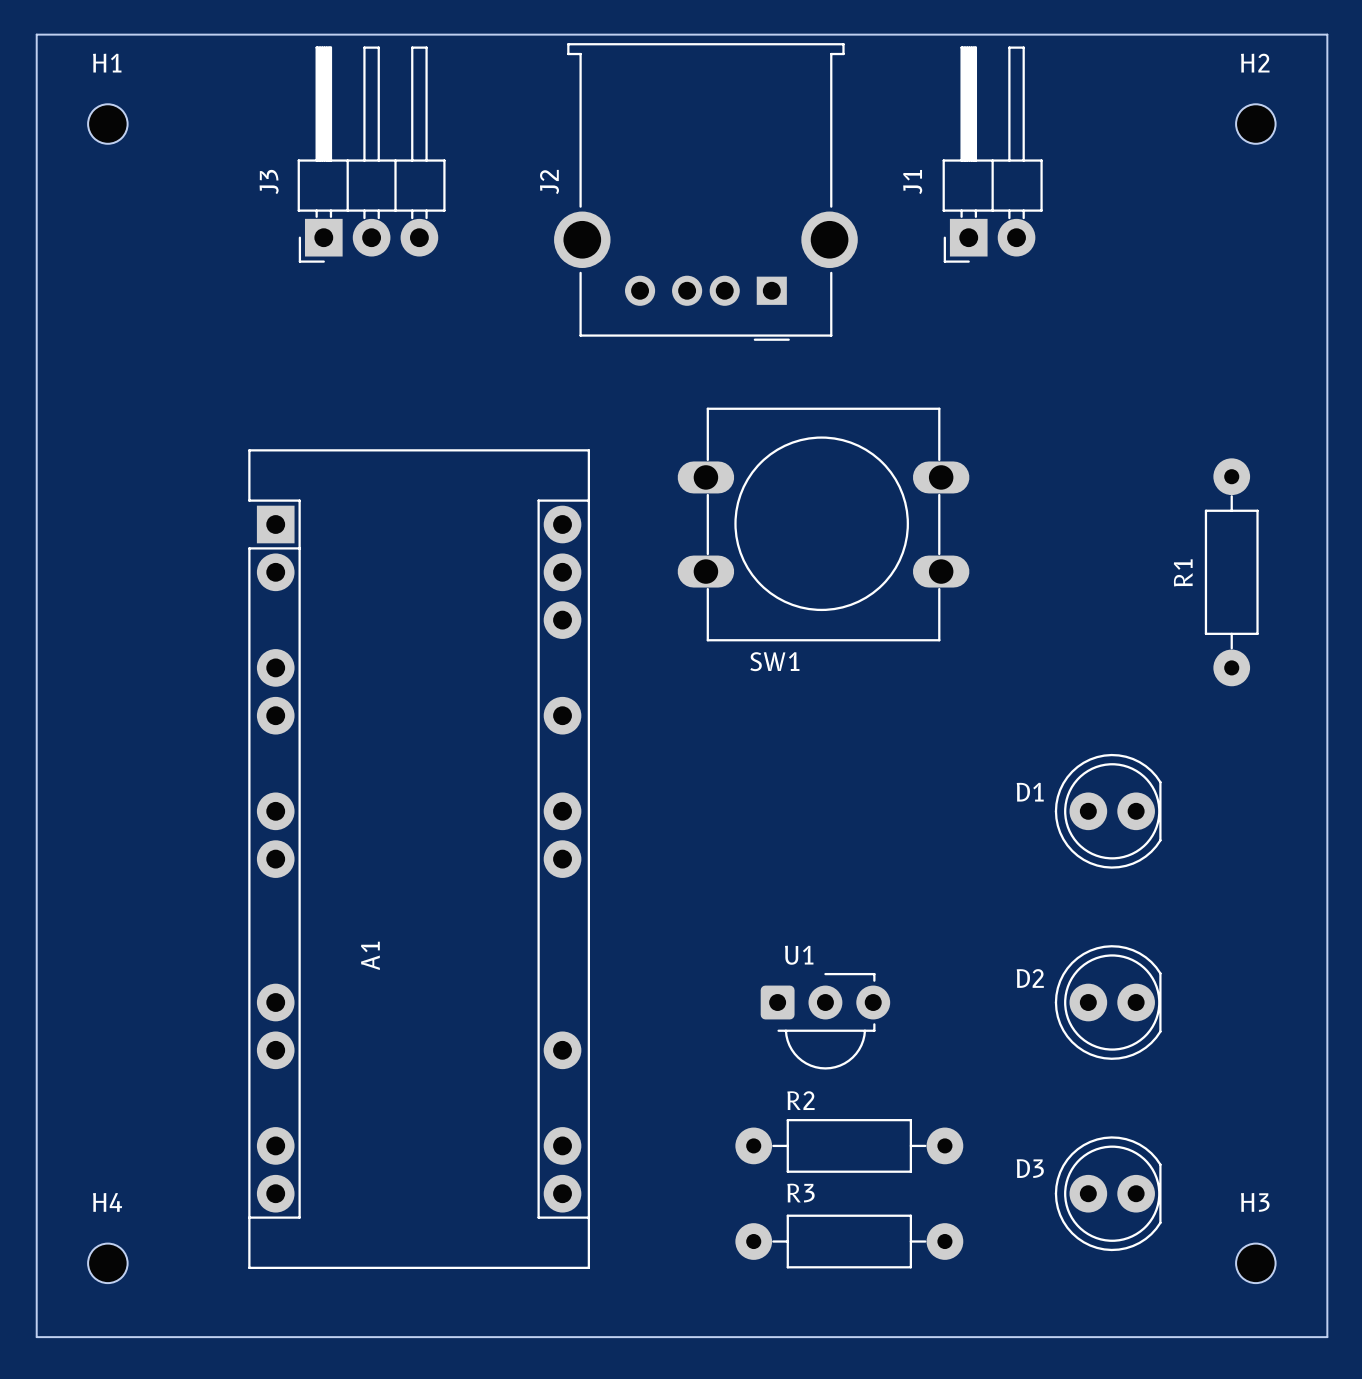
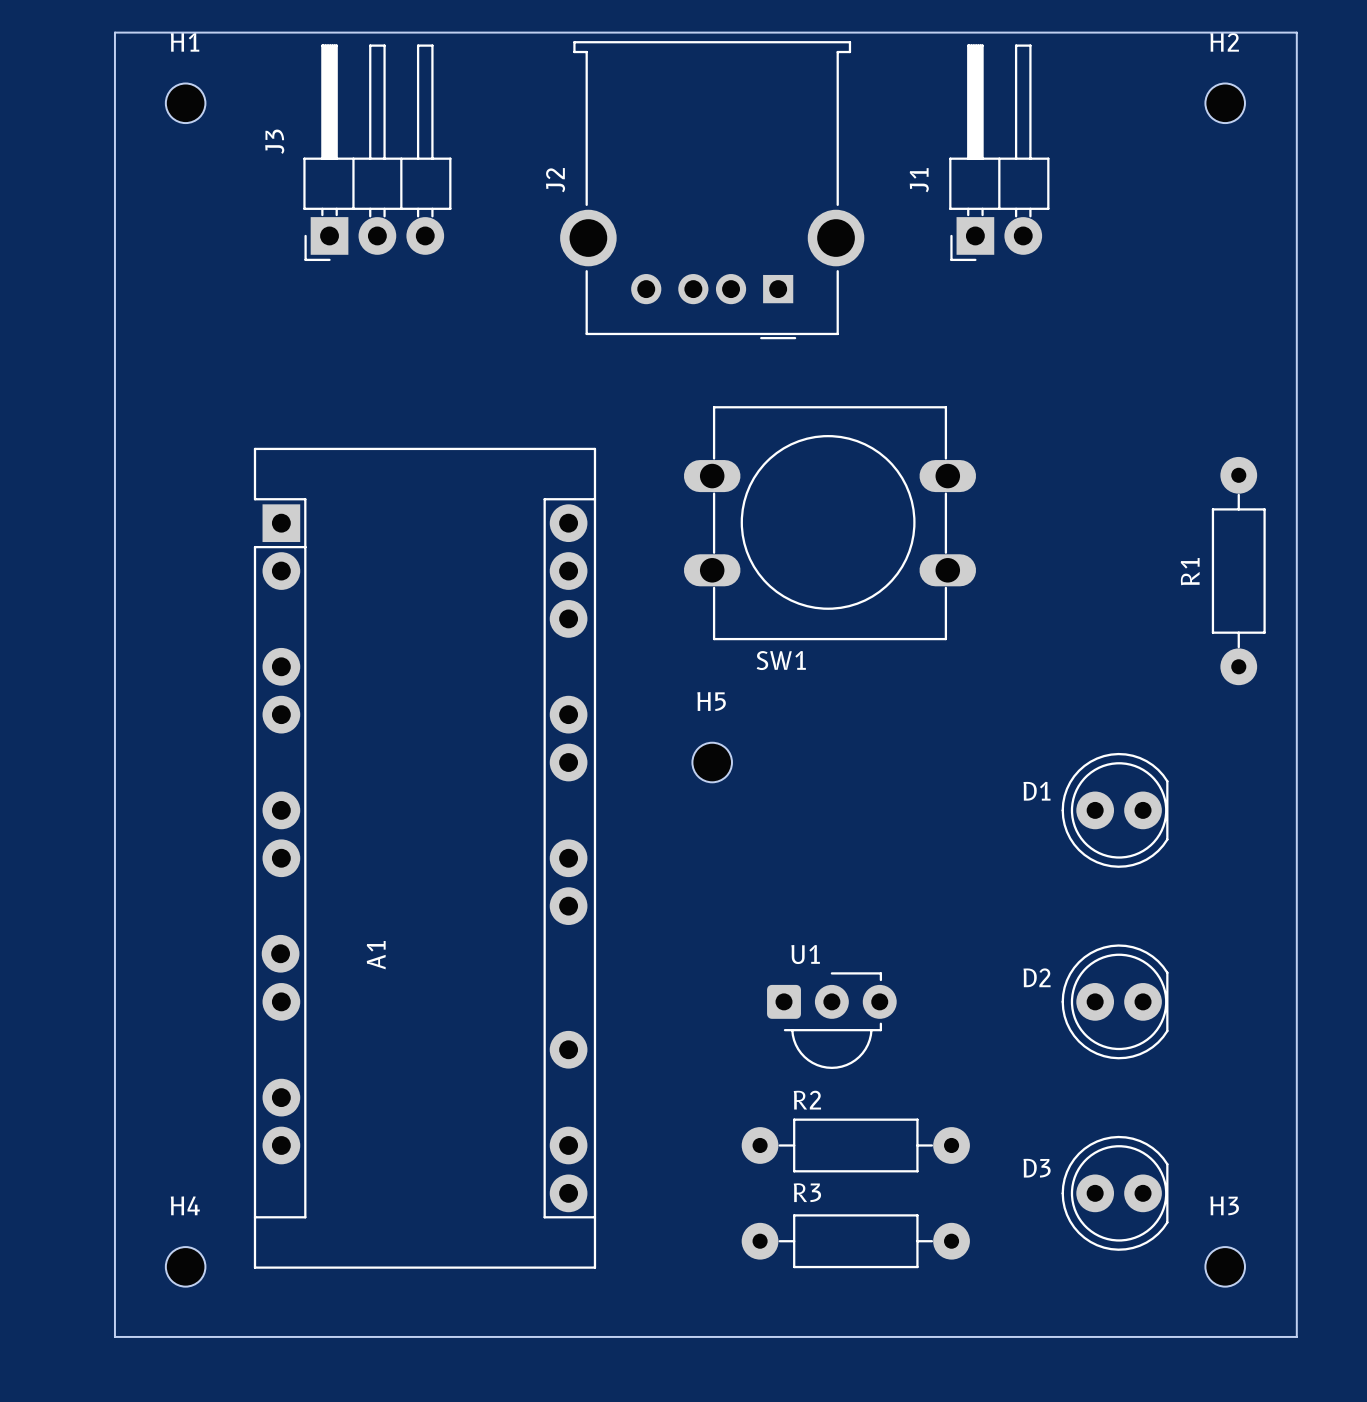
board edge: (109, 34) (36, 34) (36, 1337) (109, 1337) -> (114, 32) (114, 1336)
board edge: (1289, 34) (1327, 34) (1327, 1337) (1289, 1337) -> (1296, 32) (1296, 1336)
H1 position: (107, 124) -> (185, 103)
H2 position: (1255, 124) -> (1225, 103)
J3 name position: J3 (269, 181) -> J3 (274, 141)
A1 footprint: [248, 449, 591, 1269] -> [253, 447, 597, 1269]
H5: none -> (712, 762)
H4 position: (107, 1263) -> (185, 1266)
H3 position: (1255, 1263) -> (1225, 1266)

